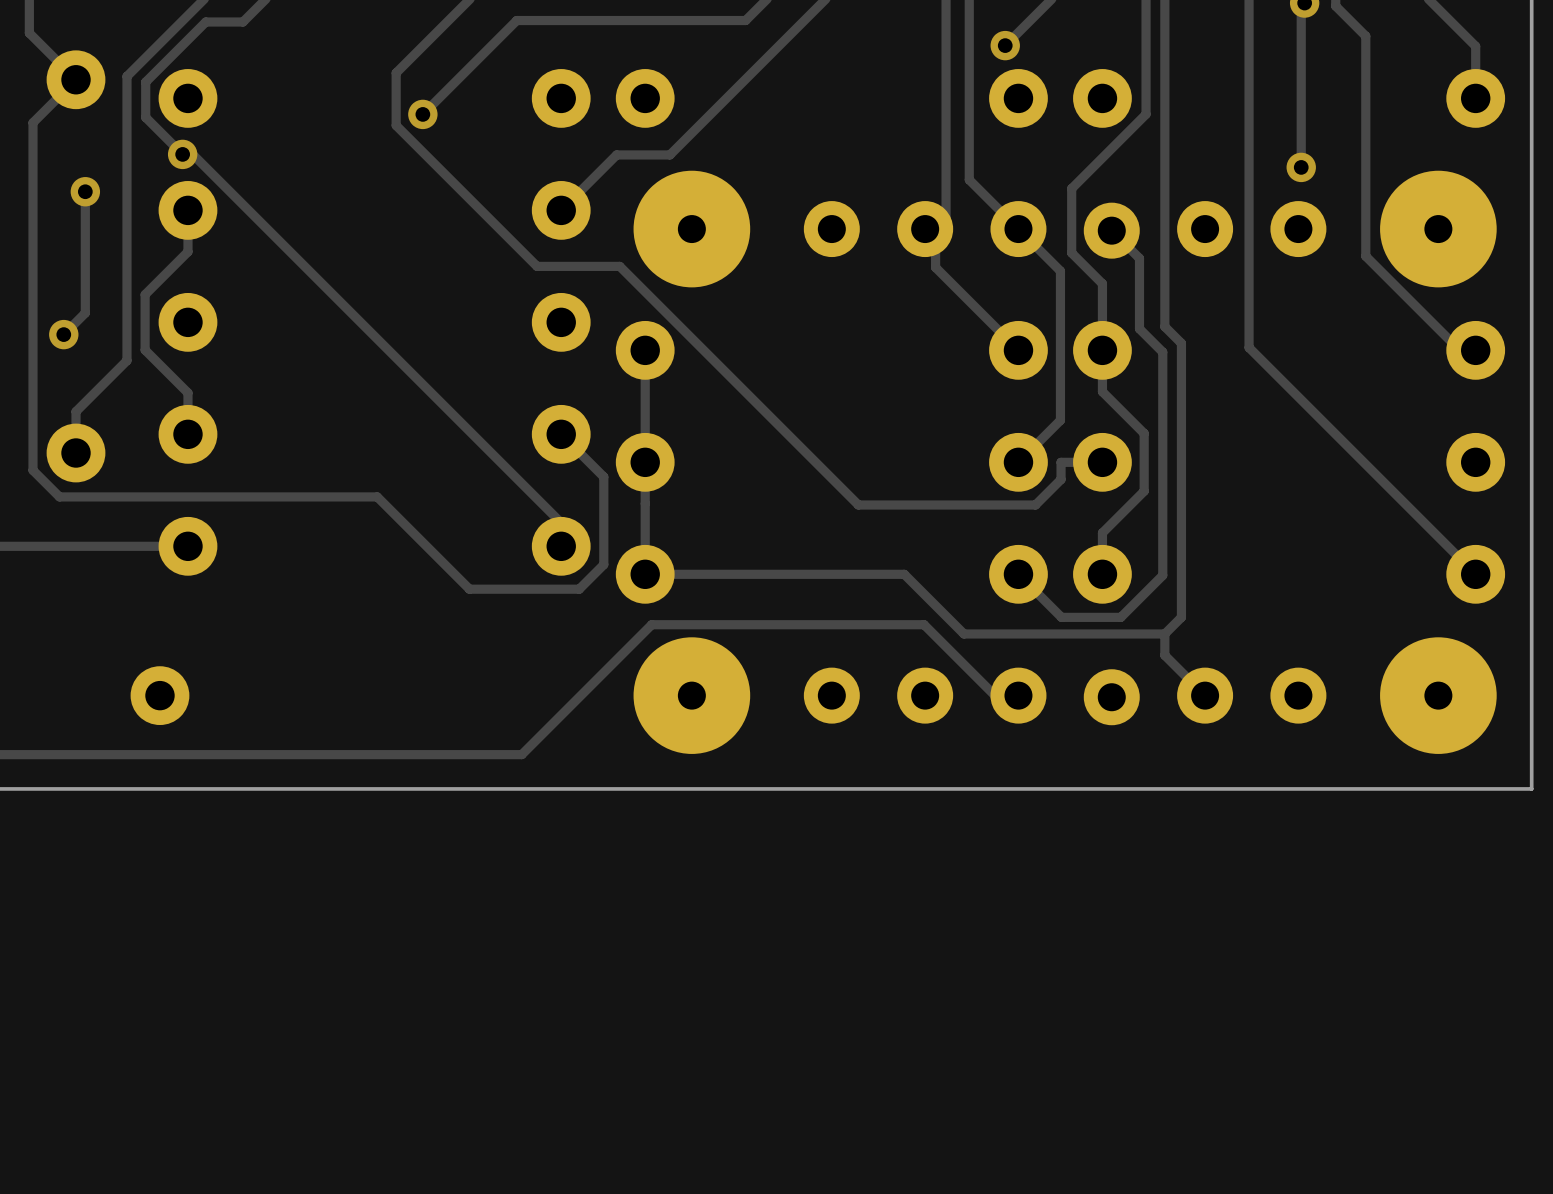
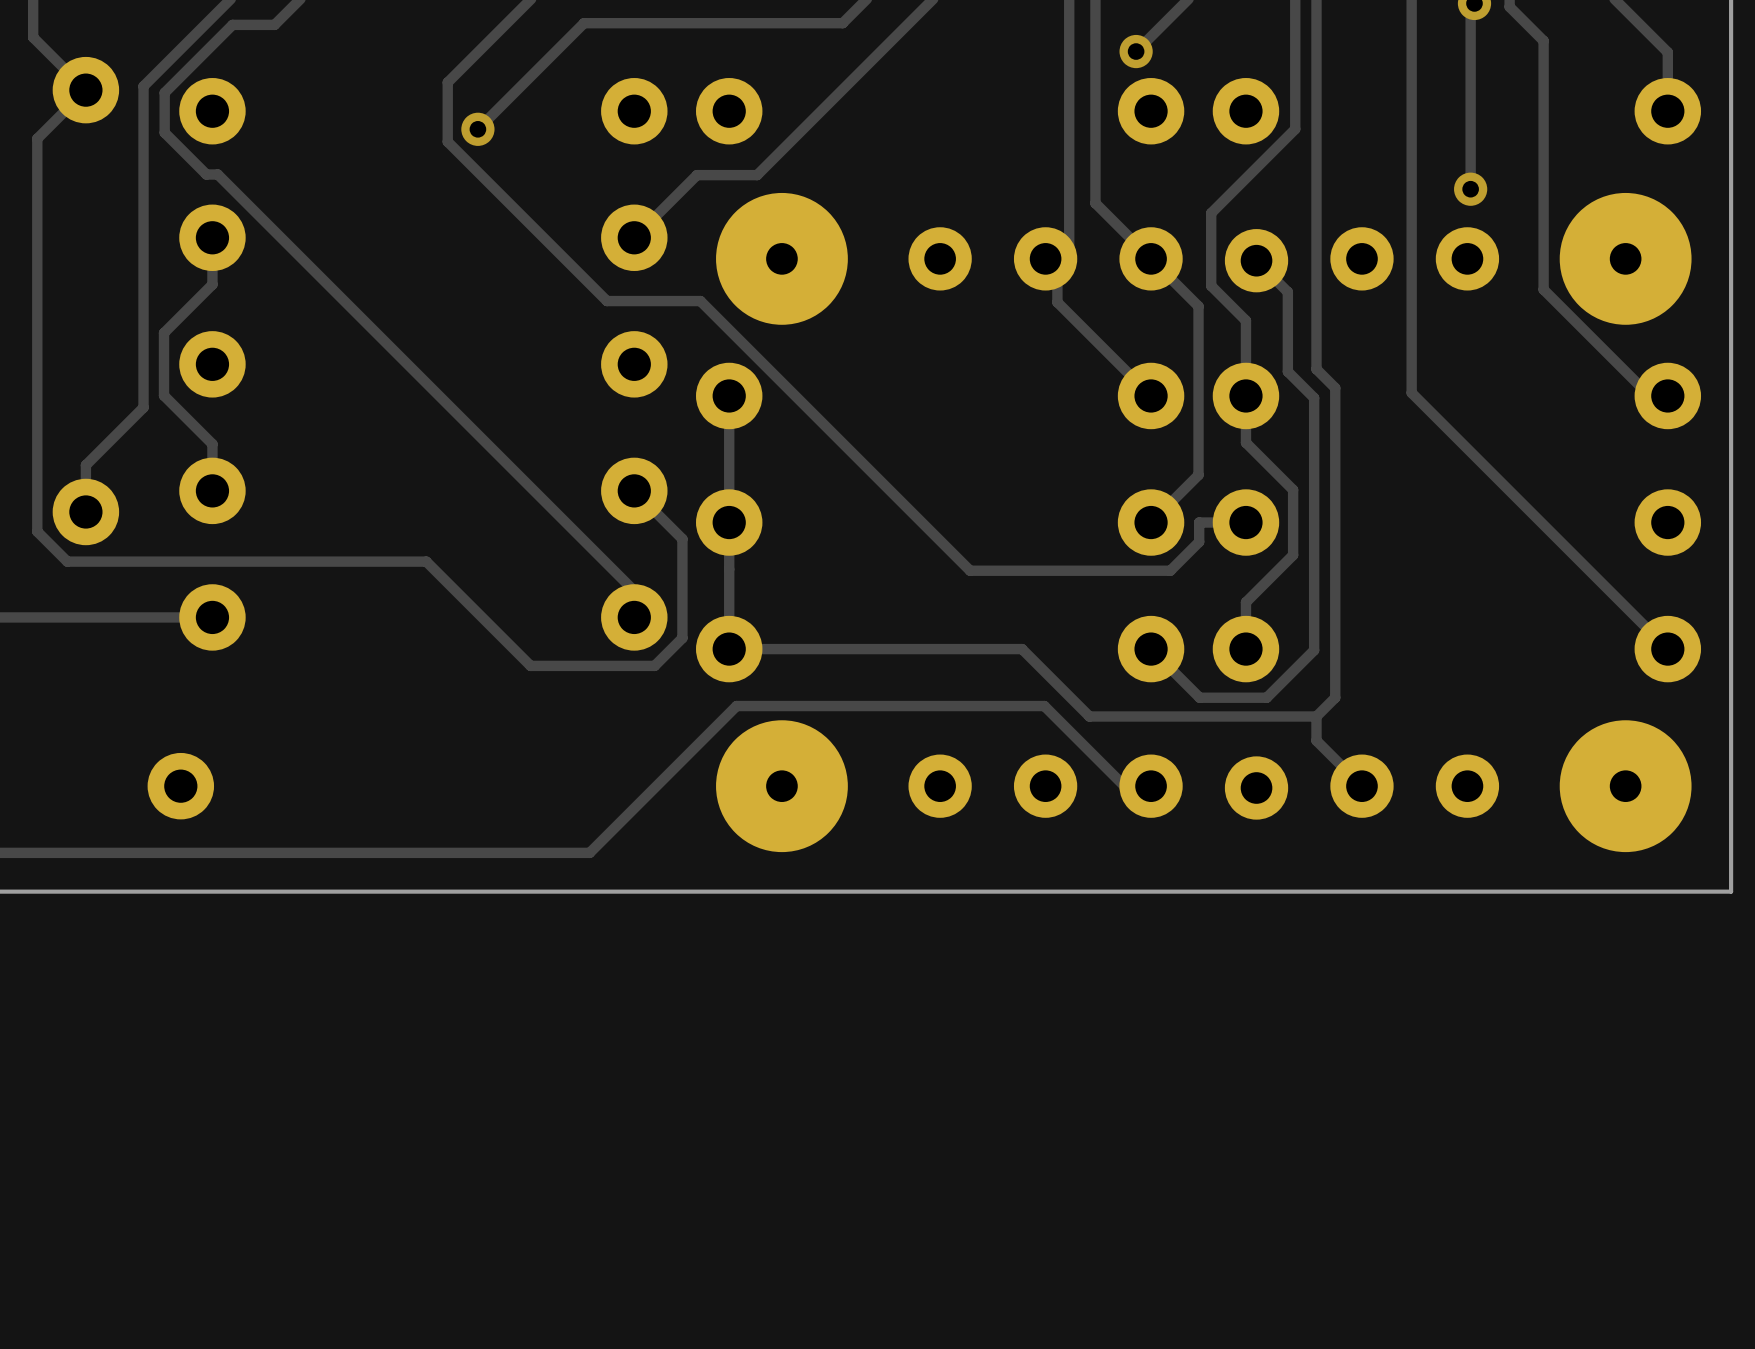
via: (182, 154) -> none
track: (85, 191) (85, 313) (63, 334) -> none
via: (85, 191) -> none
via: (63, 334) -> none

